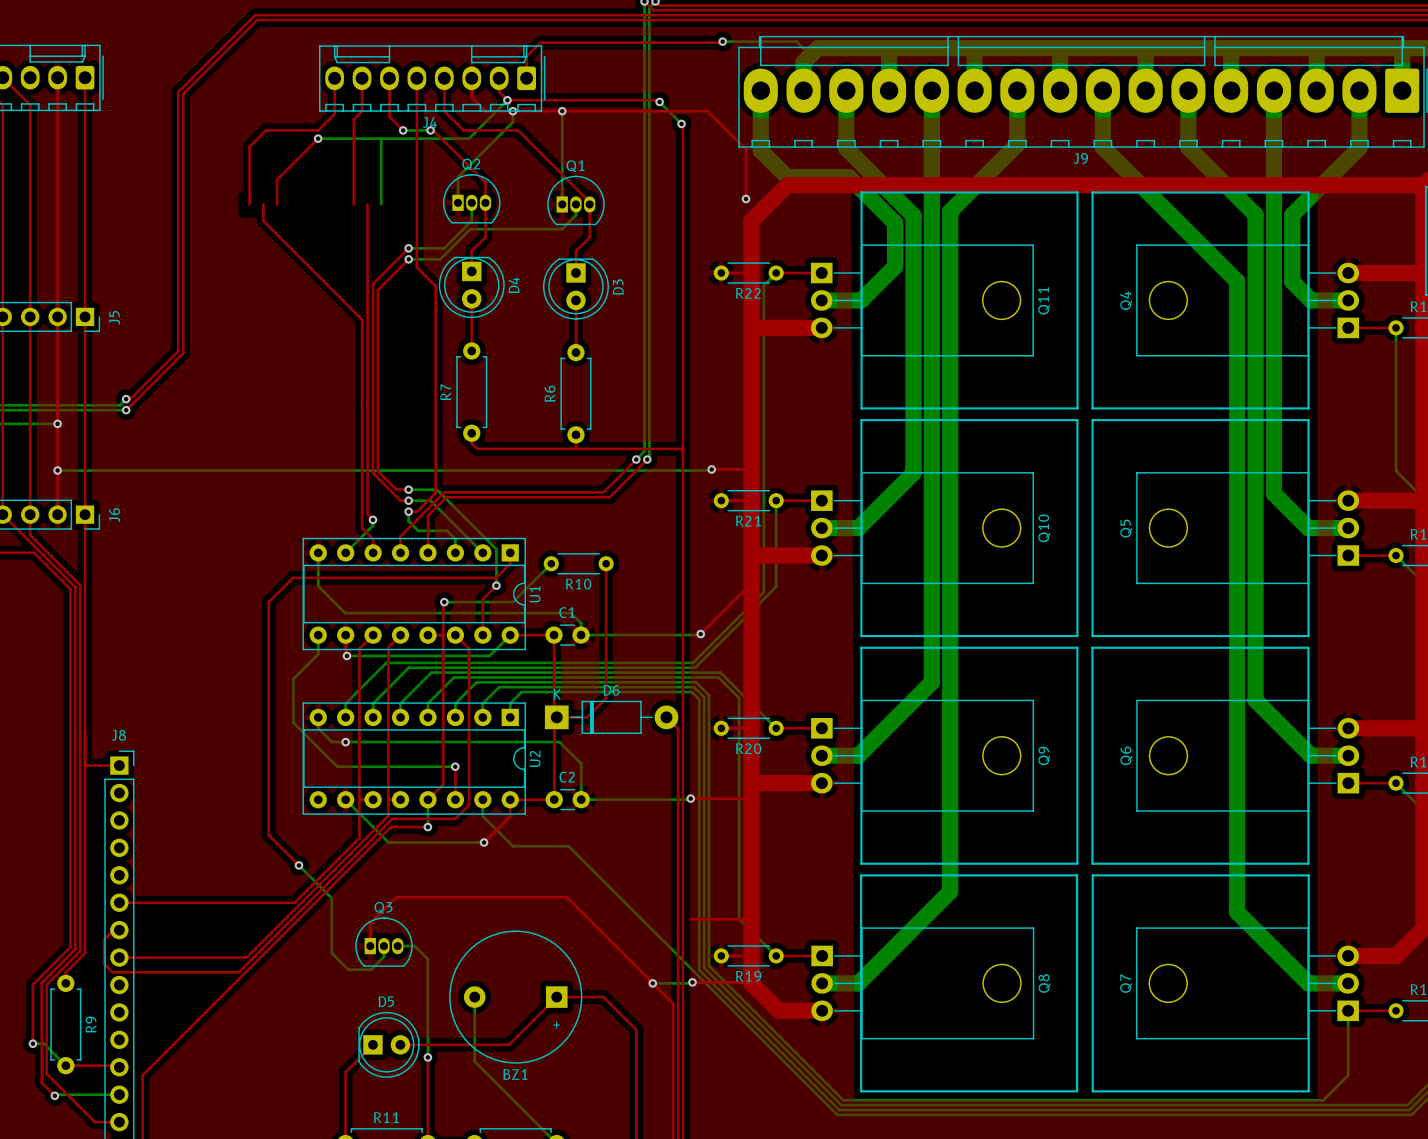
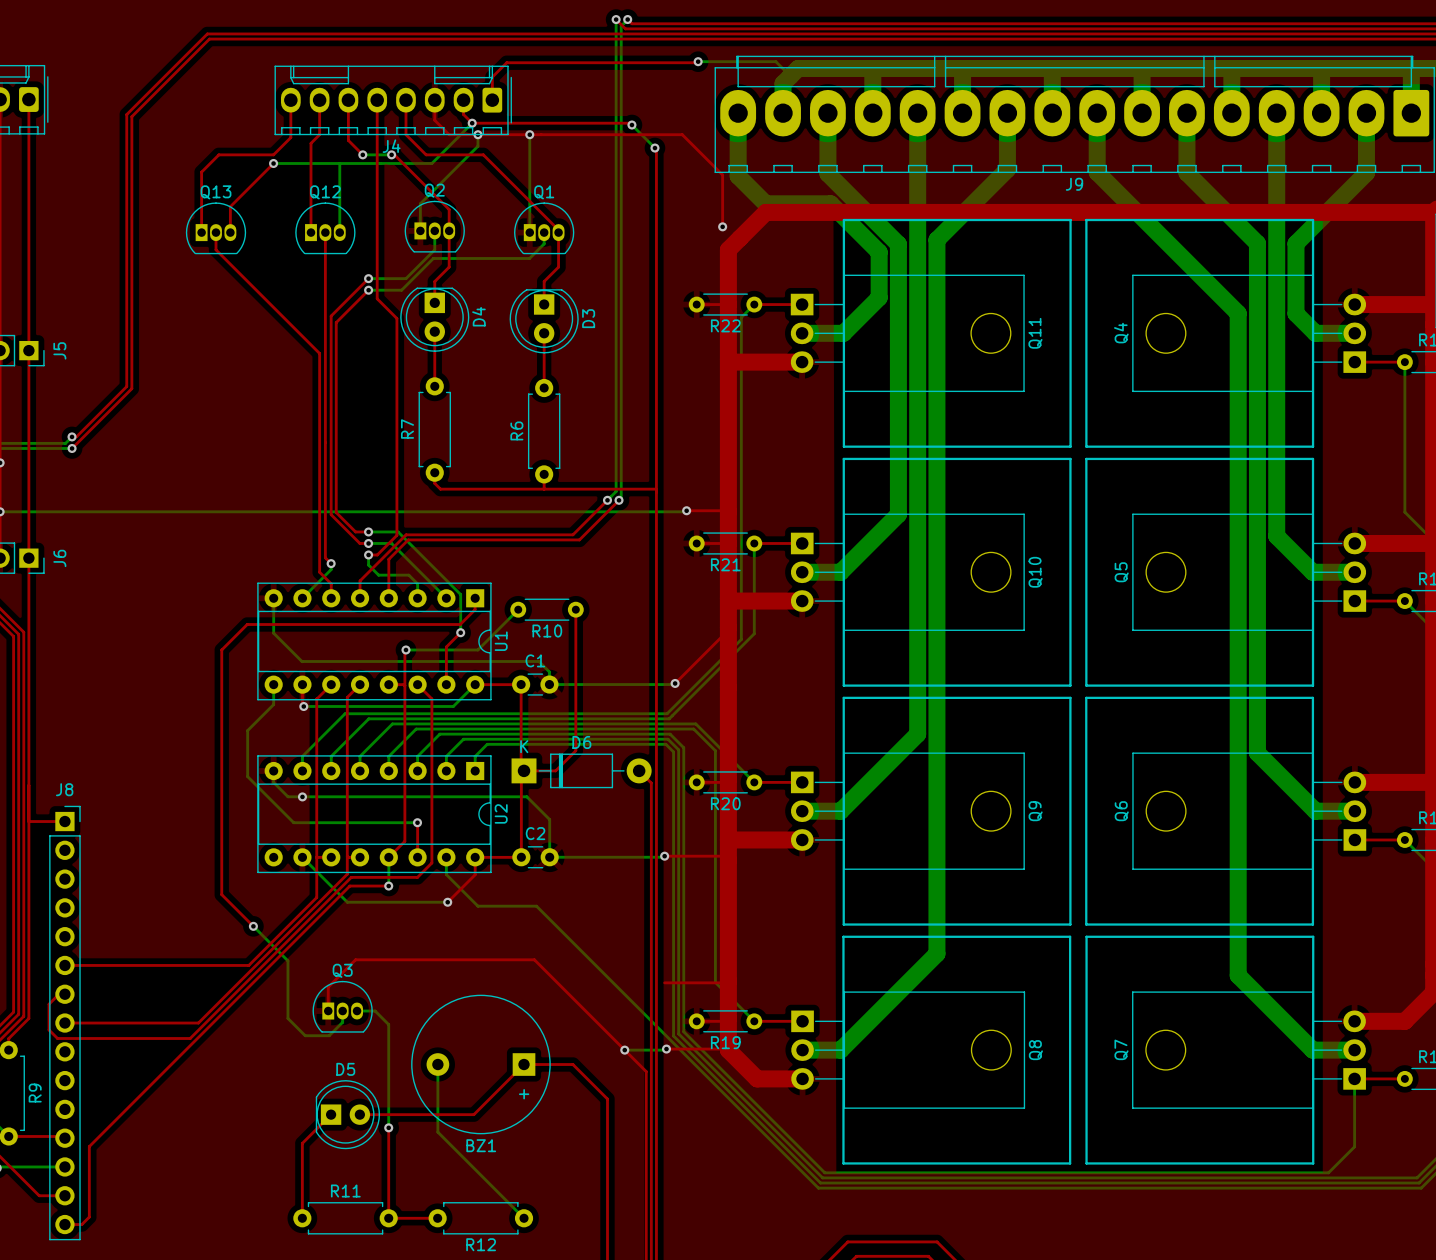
Q13: none -> (216, 228)
Q12: none -> (325, 228)

